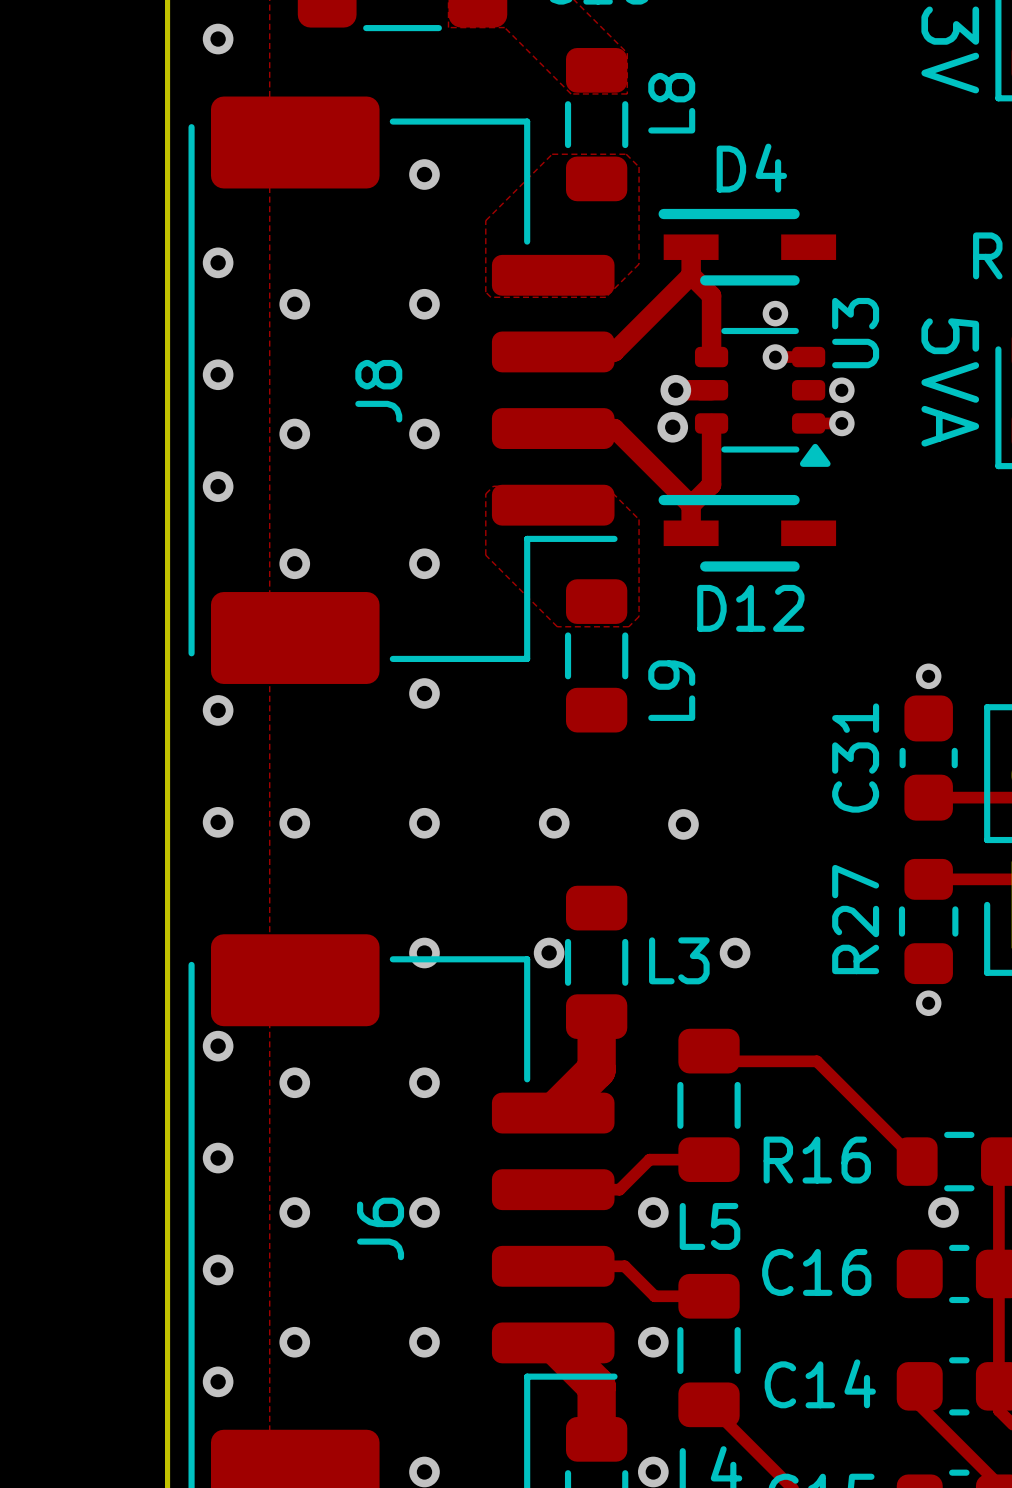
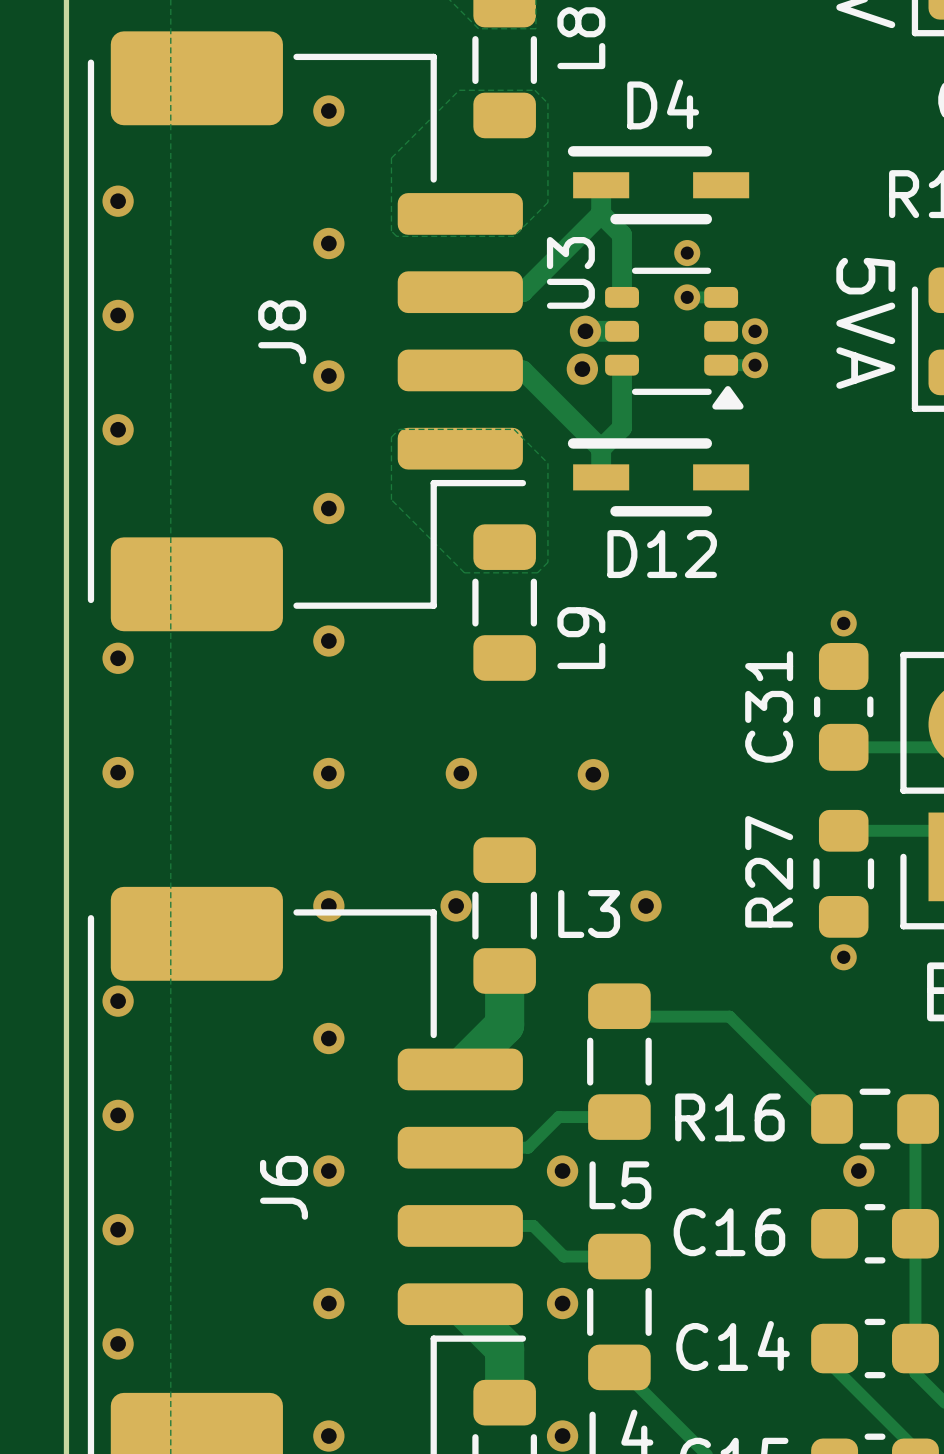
via: (294, 304) -> none
U3 name position: U3 (855, 333) -> U3 (570, 272)
via: (294, 434) -> none
via: (294, 563) -> none
via: (294, 823) -> none
via: (294, 1082) -> none
via: (294, 1212) -> none
via: (294, 1342) -> none

